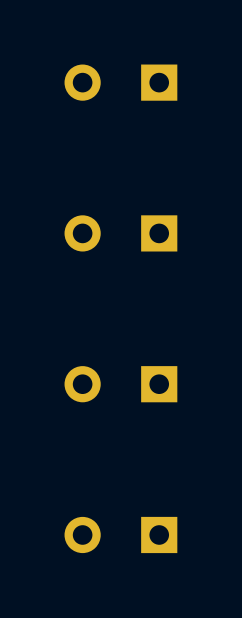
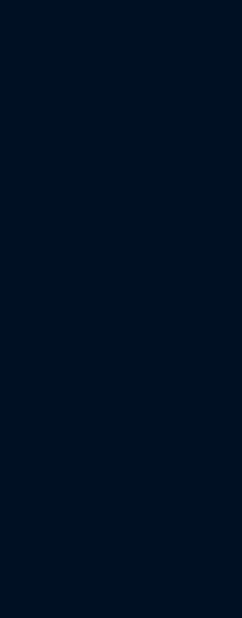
part: (120, 82) -> none
part: (120, 233) -> none
part: (120, 384) -> none
part: (120, 534) -> none

